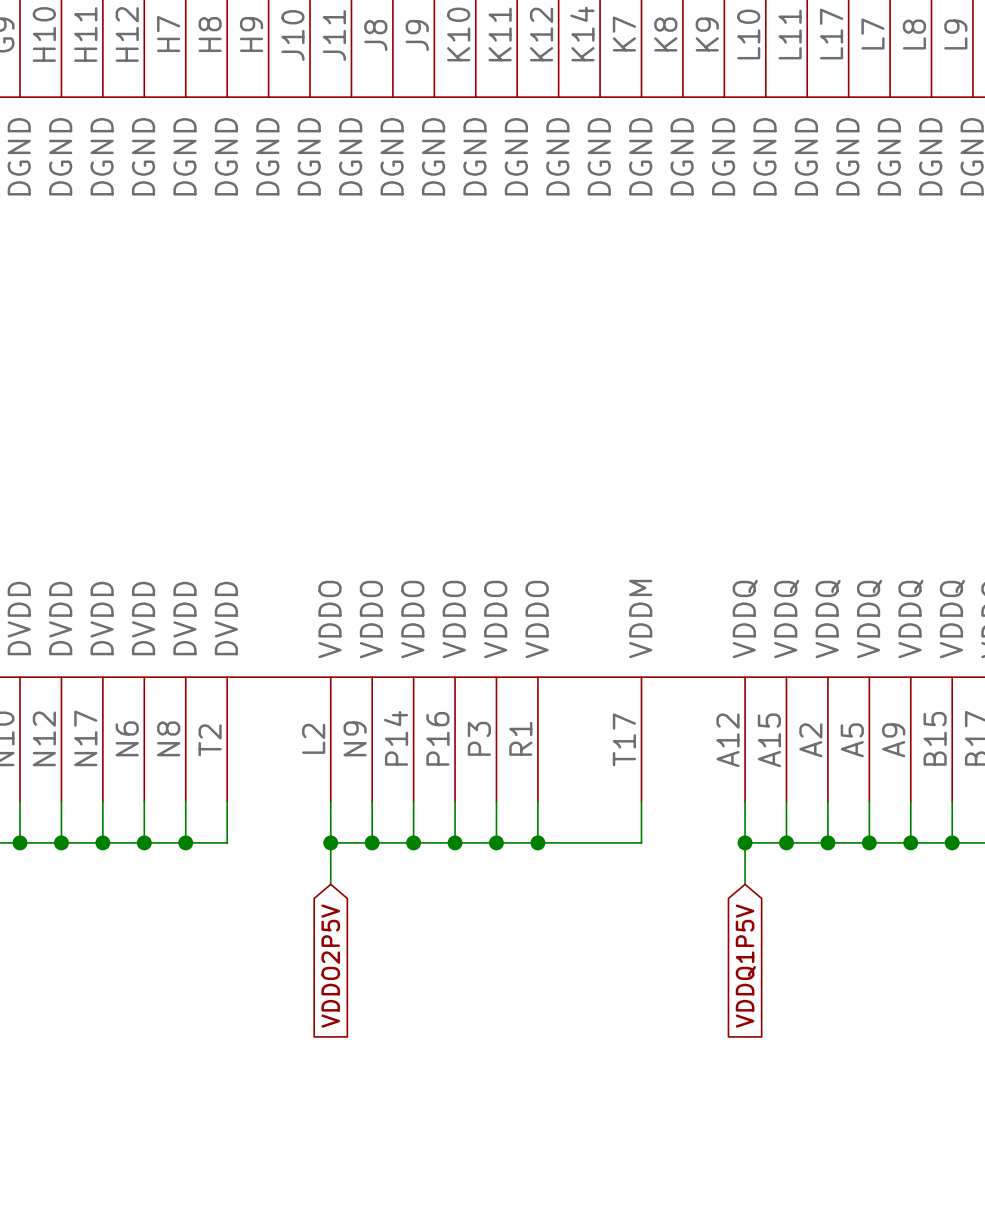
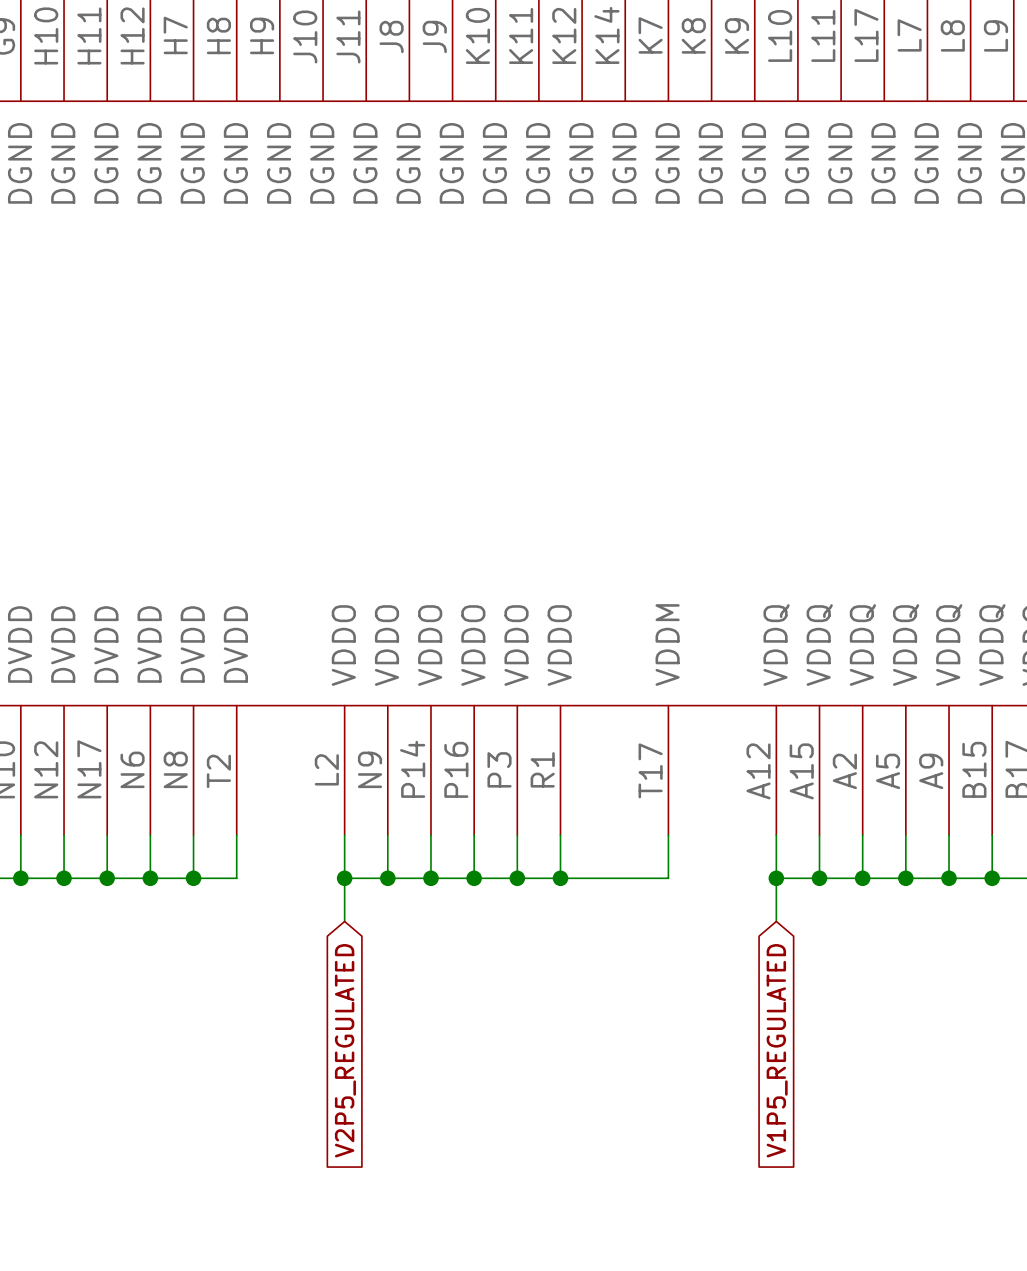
global label: VDDO2P5V (330, 966) -> V2P5_REGULATED (345, 1050)
global label: VDDQ1P5V (745, 966) -> V1P5_REGULATED (777, 1050)

